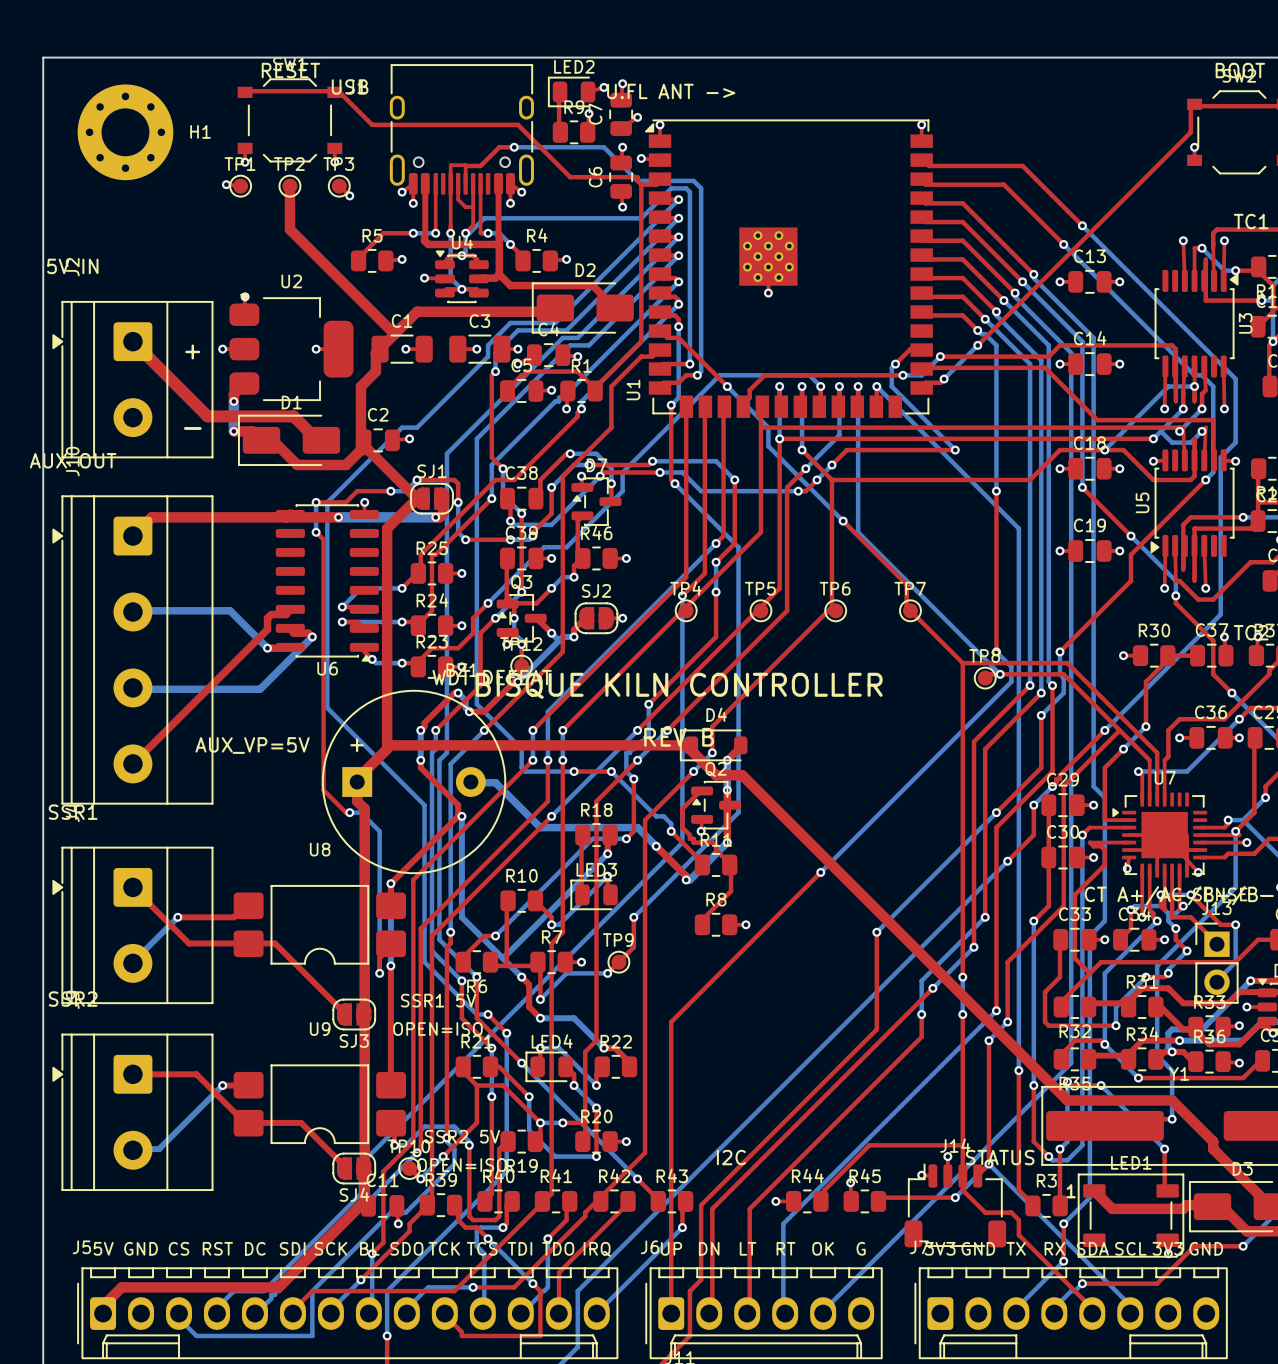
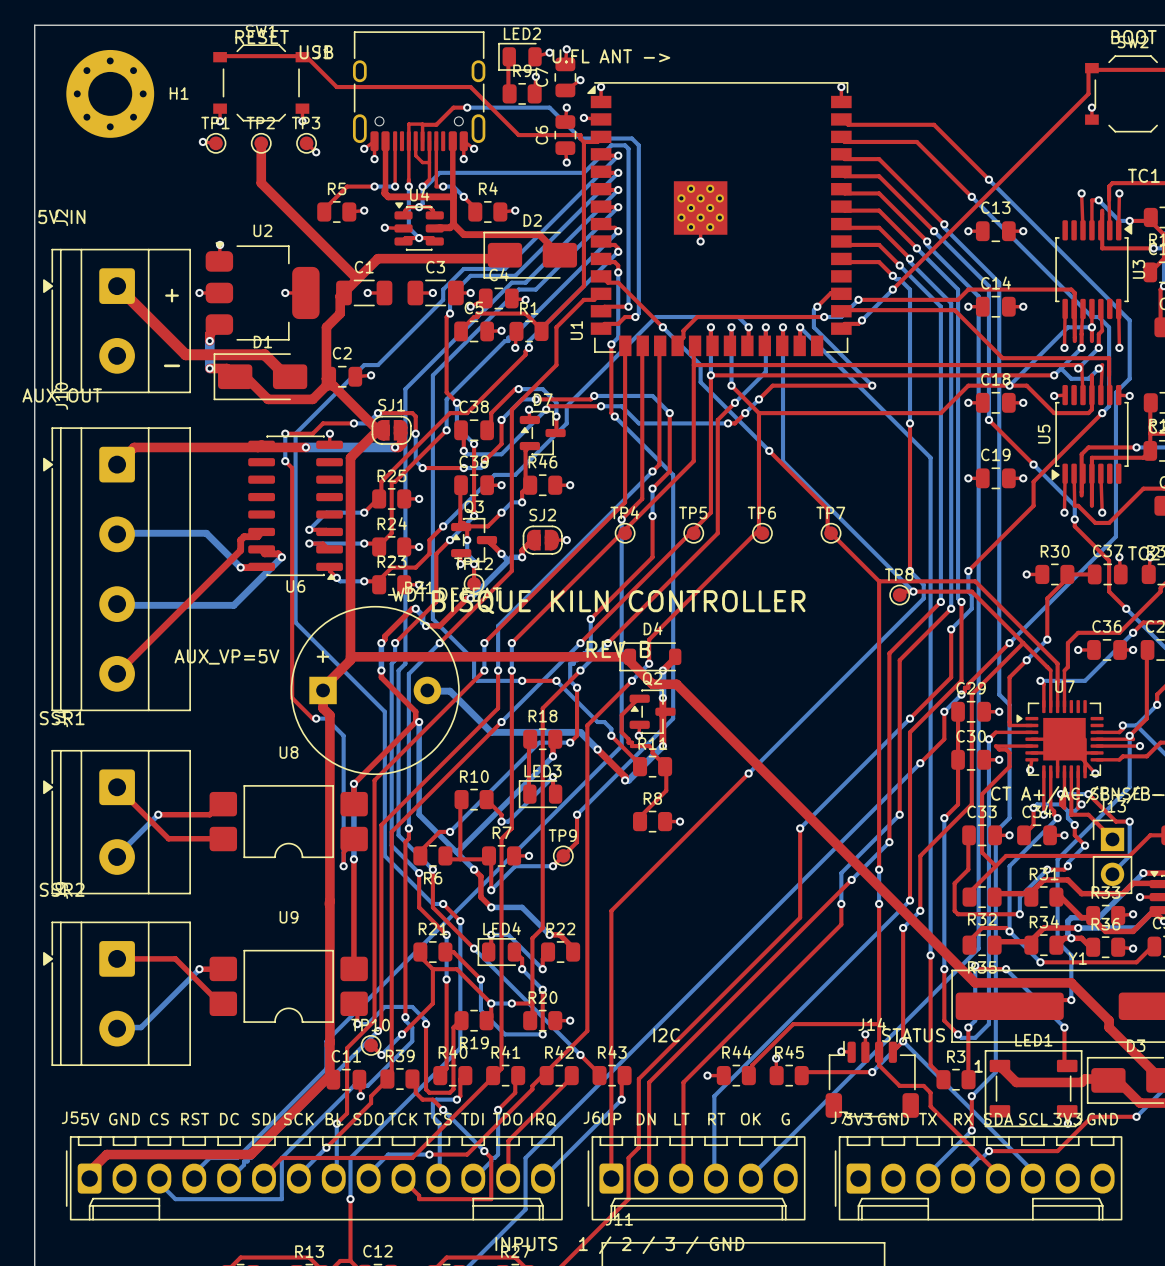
top track: (245, 943) (275, 943) (344, 1014) -> none
text: SSR1 5V (438, 1000) -> none
SJ3: (354, 1014) -> none
text: OPEN=ISO (437, 1029) -> none
top track: (245, 1122) (301, 1122) (344, 1168) -> none
text: SSR2 5V (462, 1136) -> none
text: OPEN=ISO (461, 1165) -> none
SJ4: (354, 1168) -> none

